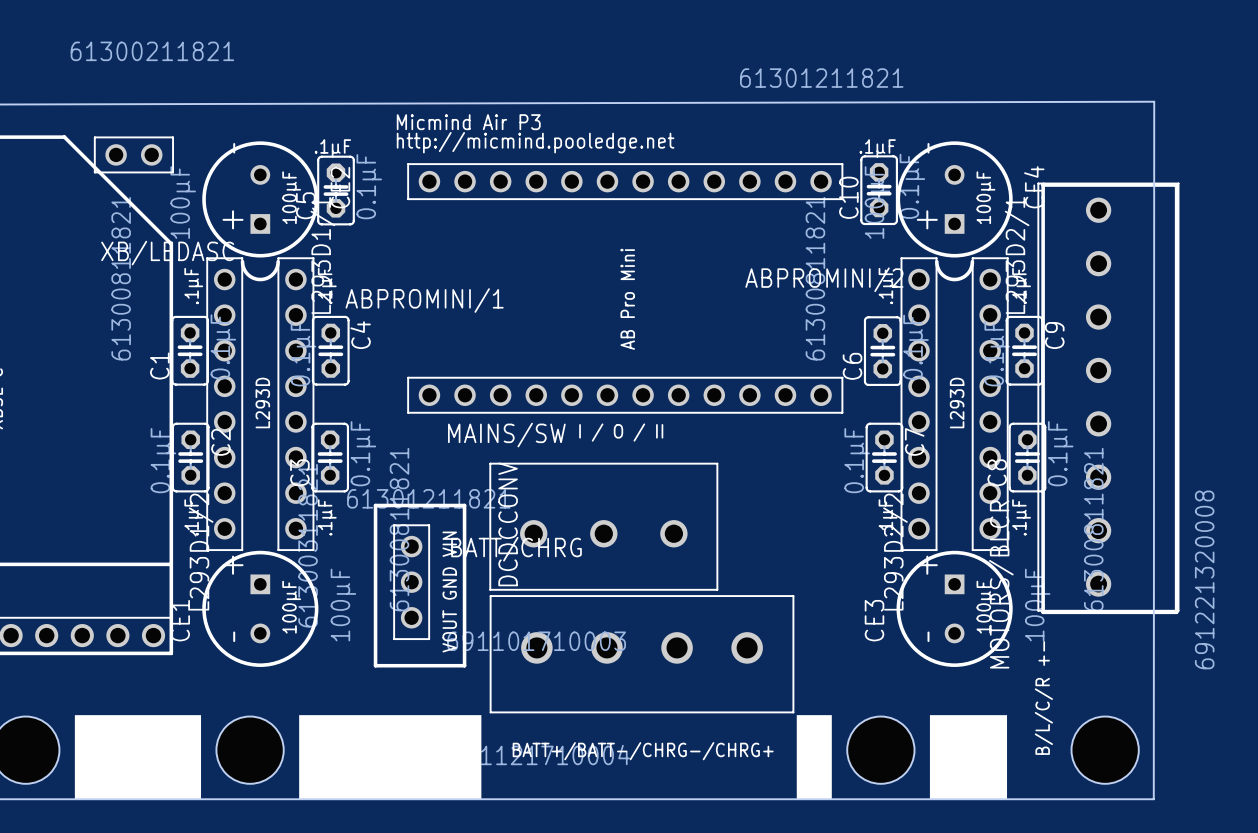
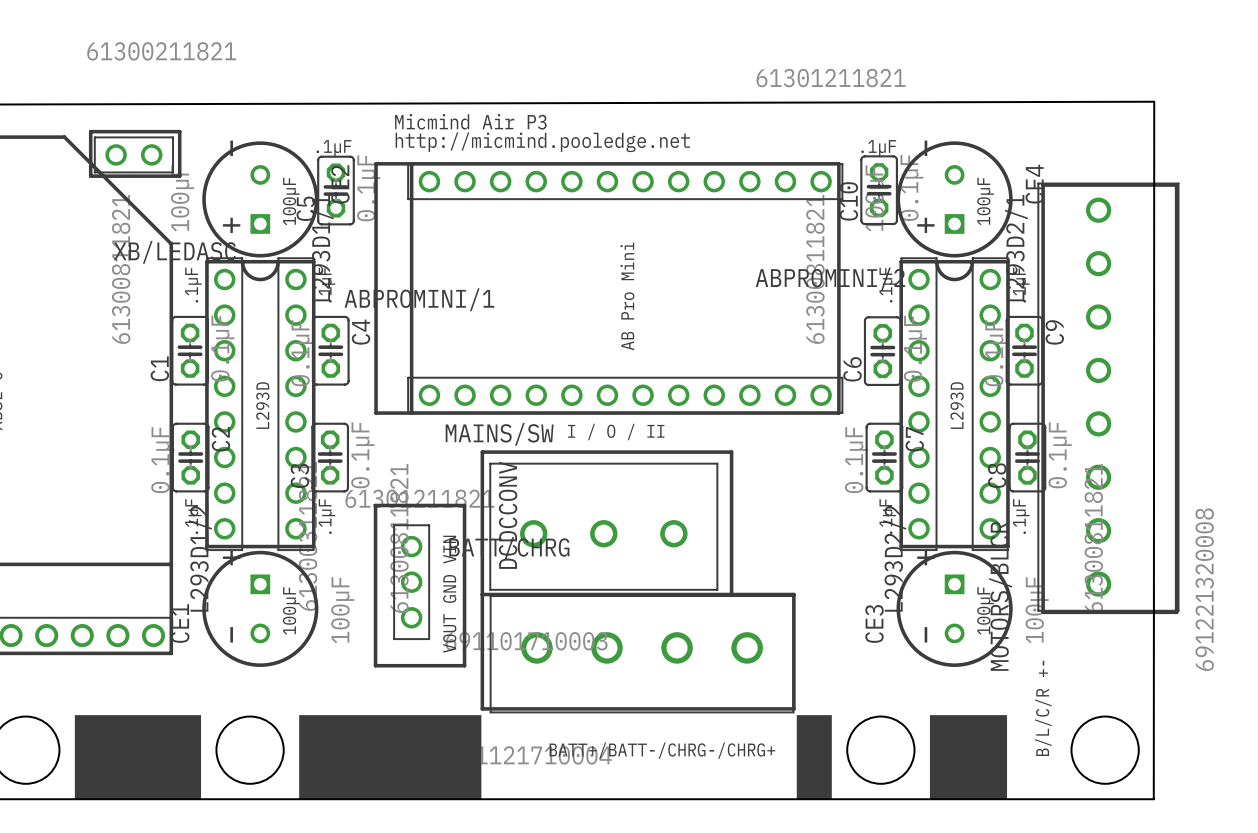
line: none -> (90, 131) (90, 176) (179, 176) (179, 131) (90, 131)
line: none -> (376, 163) (838, 163) (838, 413) (376, 413) (376, 163)
line: none -> (411, 163) (411, 413)
line: none -> (206, 261) (313, 261) (313, 546) (206, 546) (206, 261)
line: none -> (901, 261) (1008, 261) (1008, 546) (901, 546) (901, 261)
line: none -> (482, 594) (793, 594) (793, 708) (482, 708) (482, 452) (731, 452) (731, 594)

